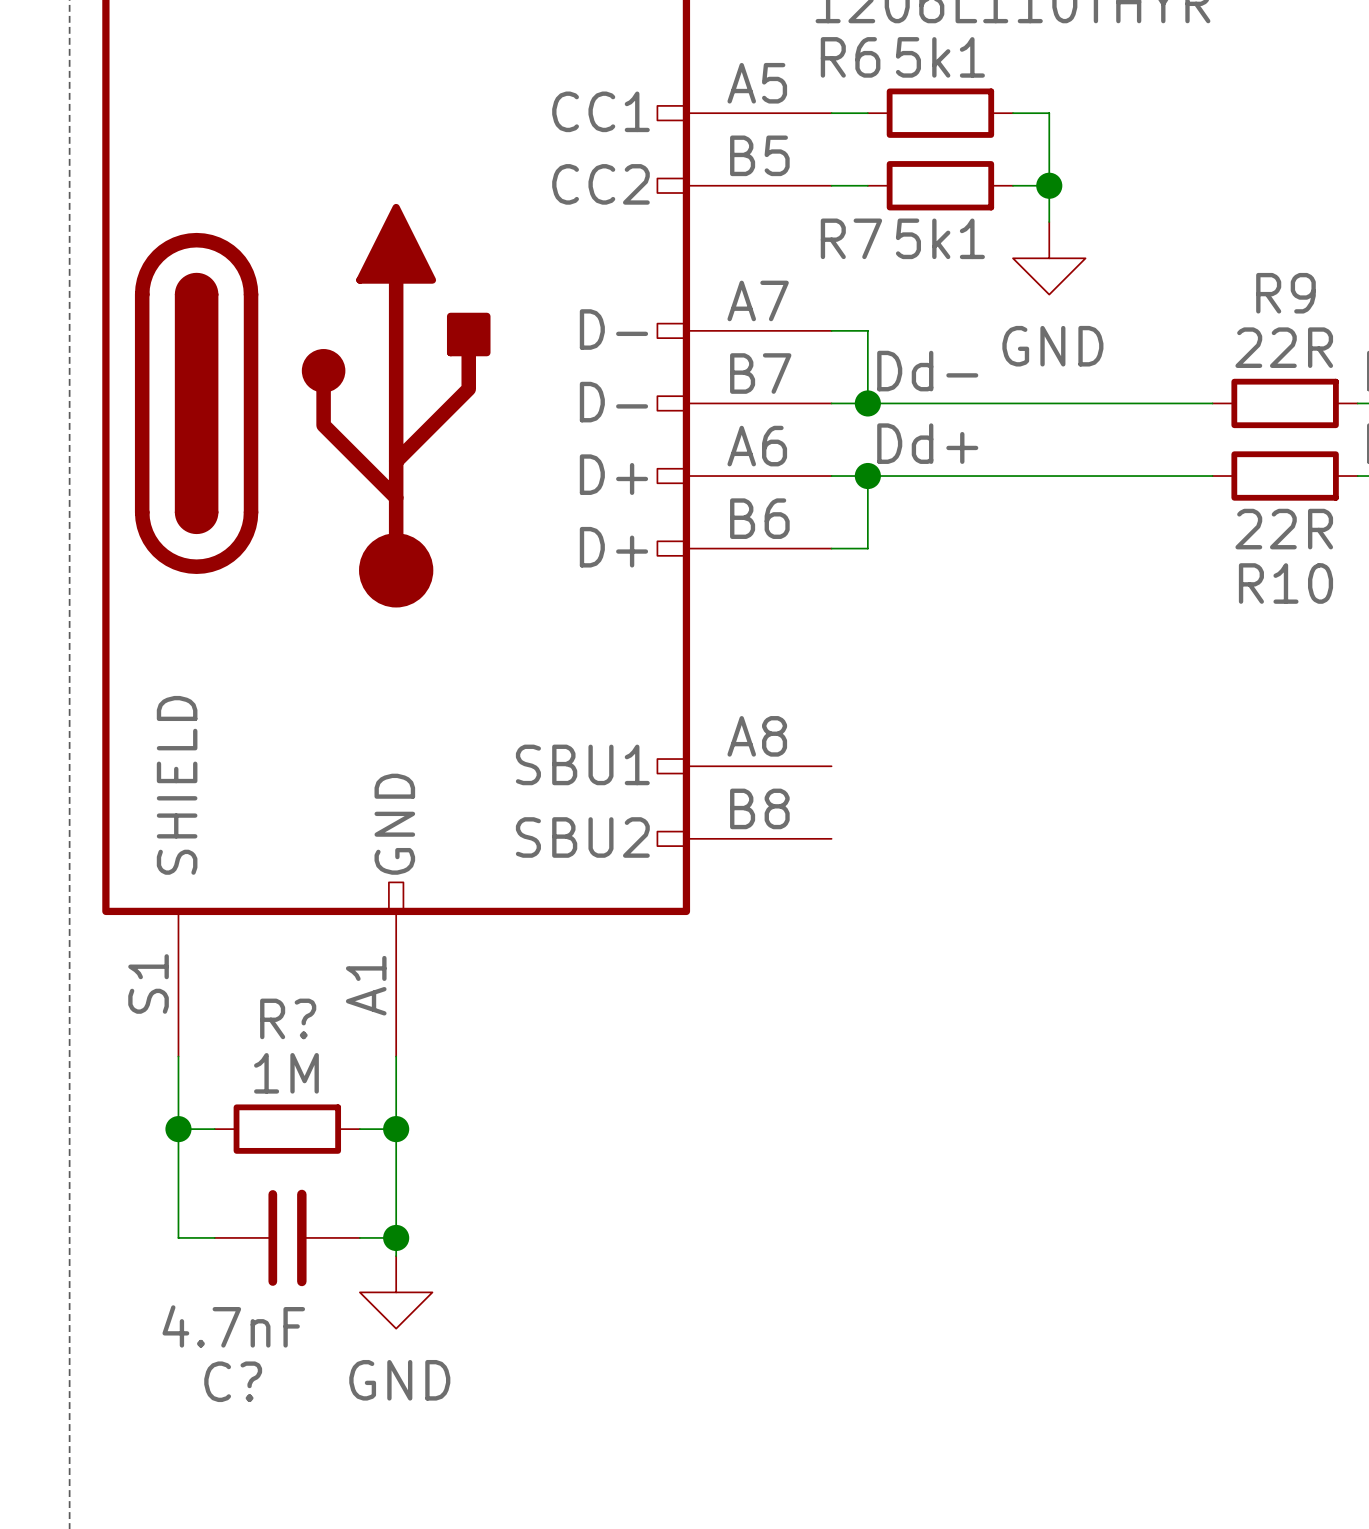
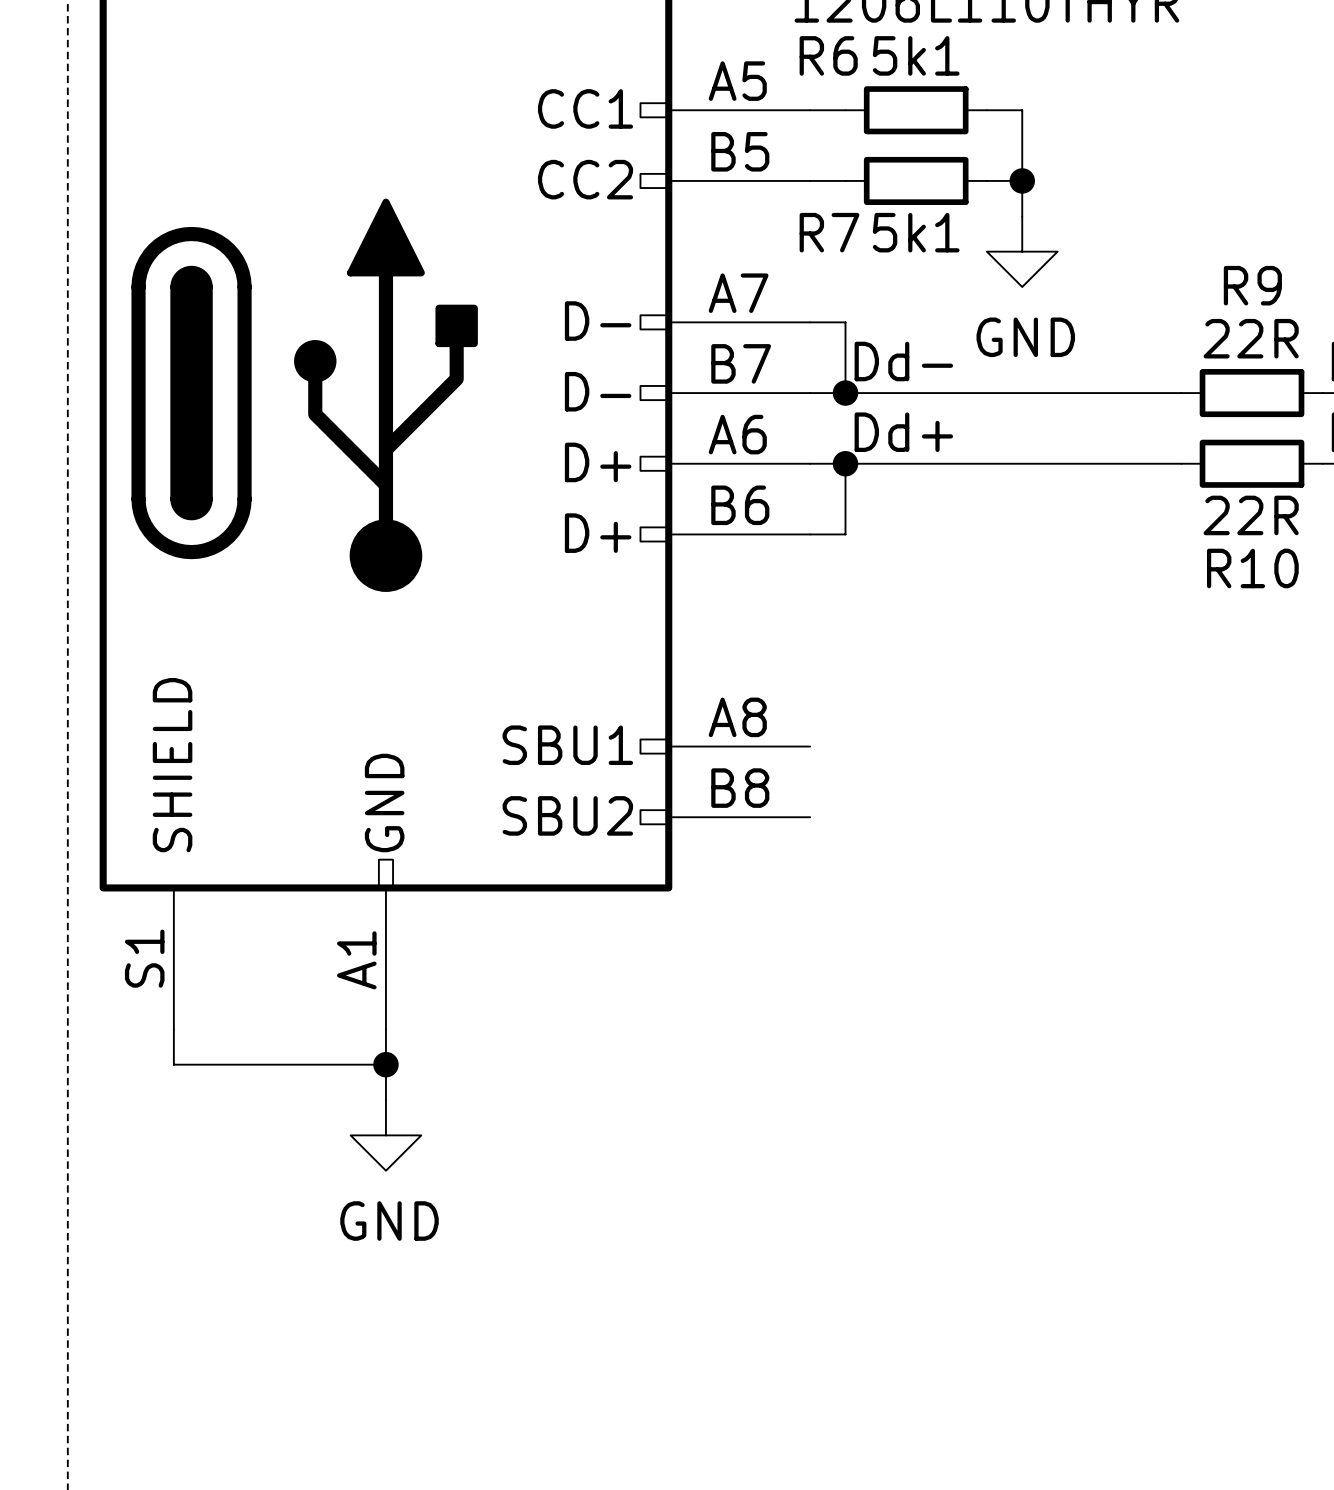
wire: (178, 1092) (178, 1237) (214, 1237) -> (173, 1064) (385, 1064)
wire: (178, 1129) (214, 1129) -> none
junction: (178, 1129) -> none
R?: 1M (287, 1129) -> none
wire: (359, 1129) (396, 1129) (396, 1256) -> none
junction position: (396, 1129) -> (385, 1064)
C?: 4.7nF (287, 1237) -> none
wire: (359, 1237) (396, 1237) -> none
junction: (396, 1237) -> none
power symbol position: GND (396, 1292) -> GND (385, 1135)

